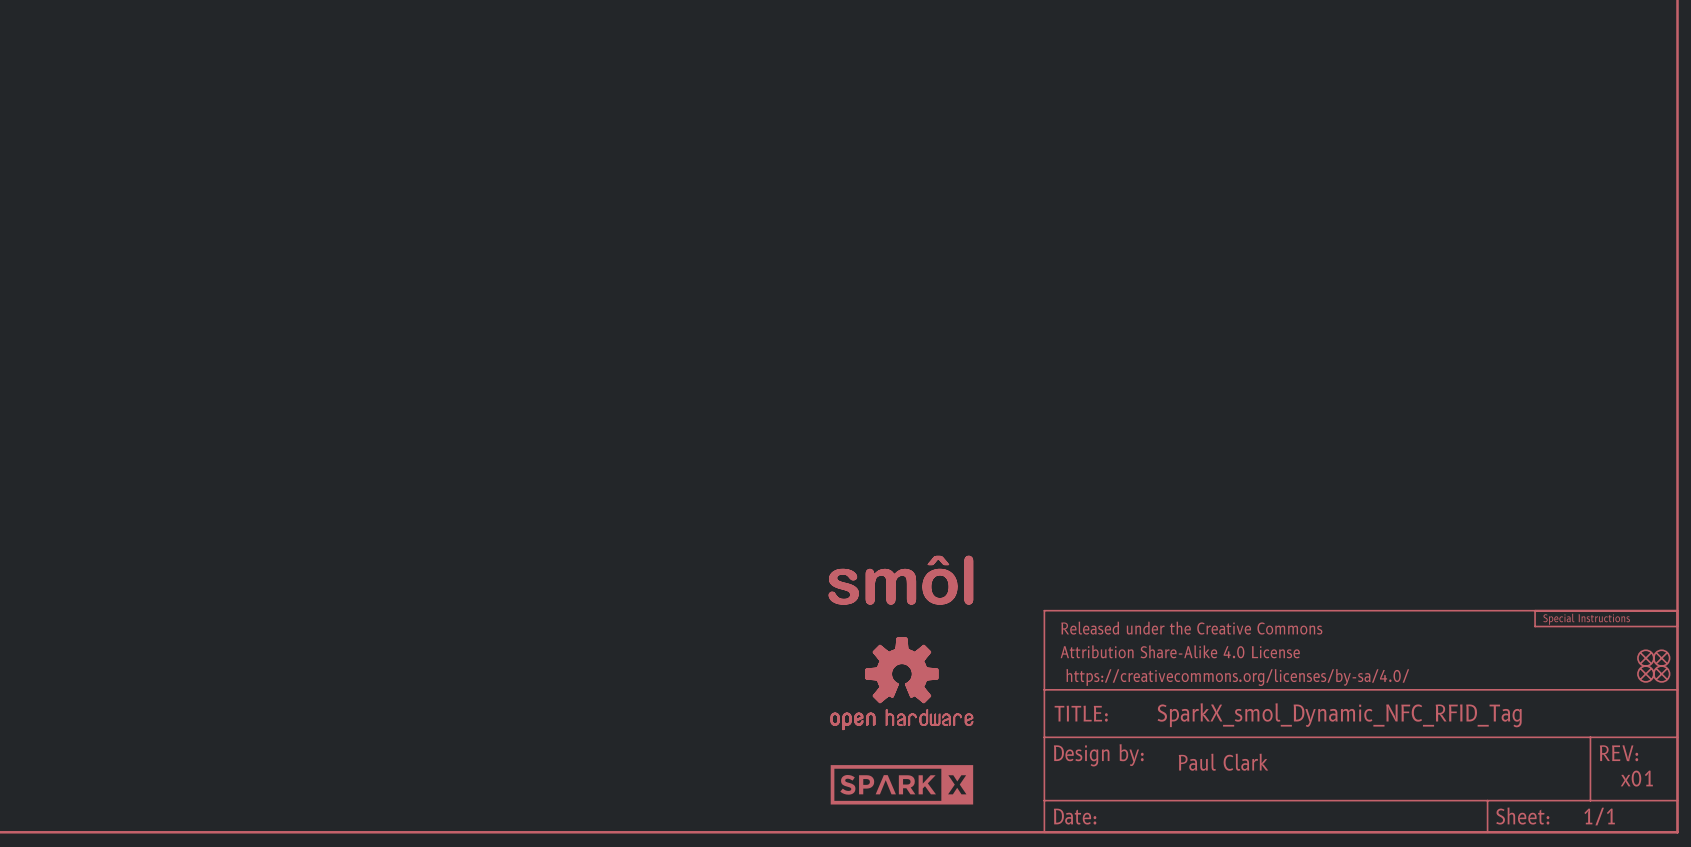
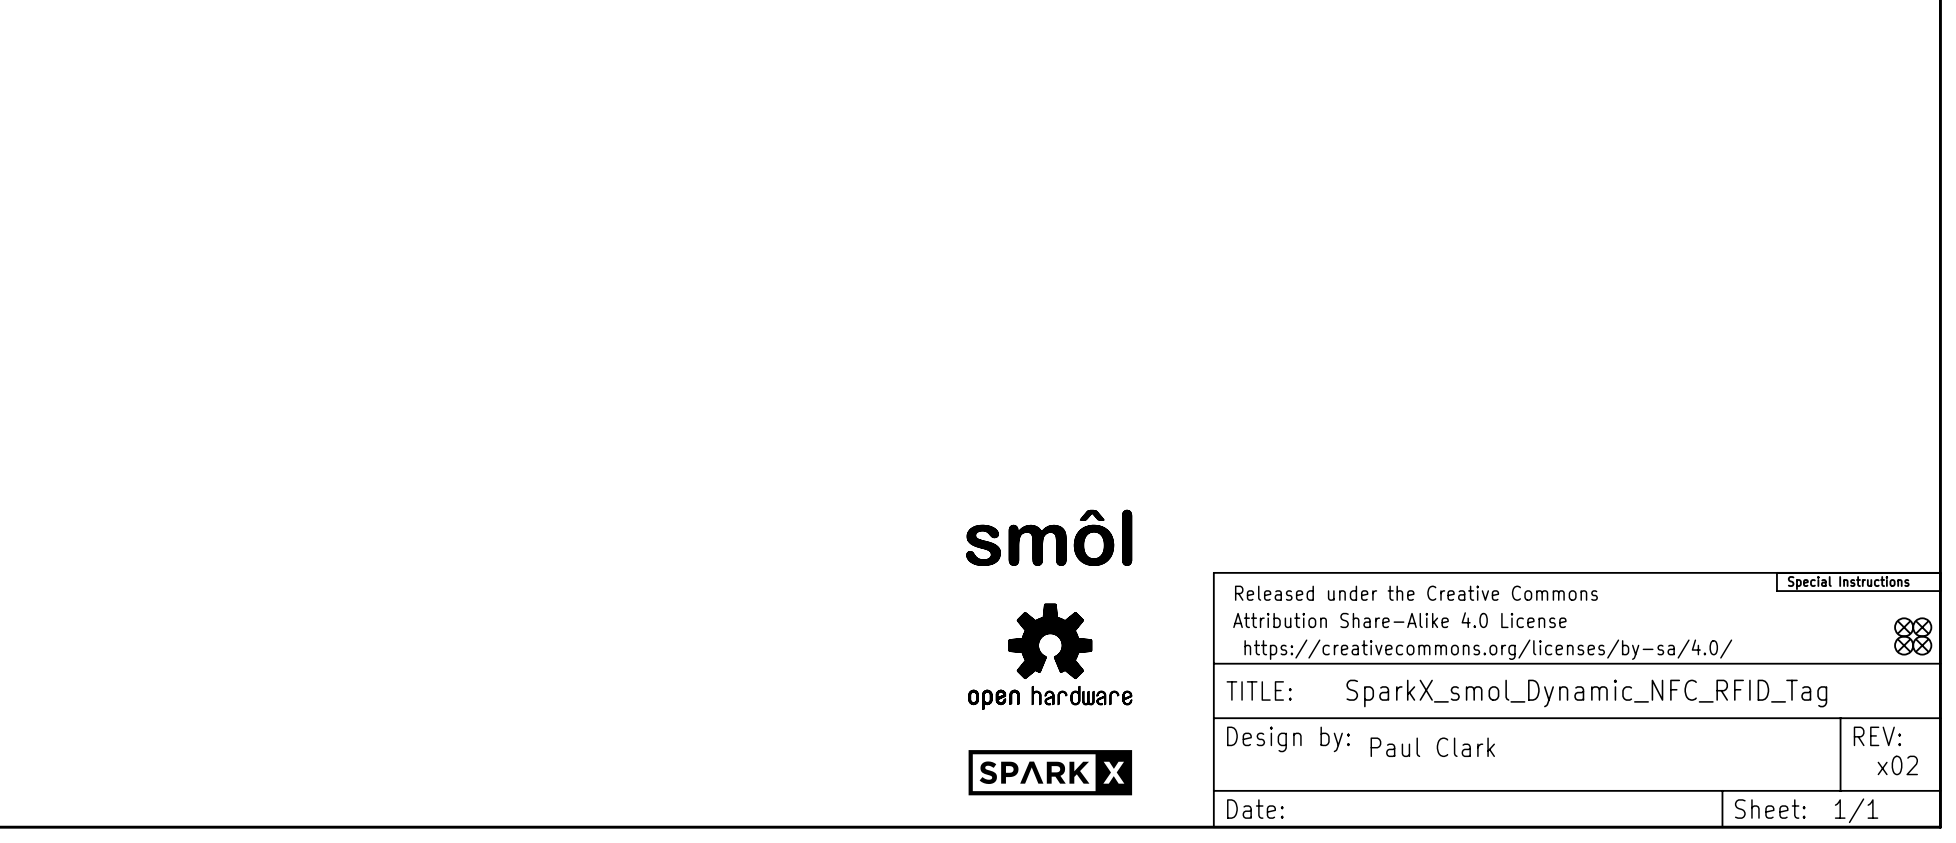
text: x01 (1636, 778) -> x02 (1897, 765)

